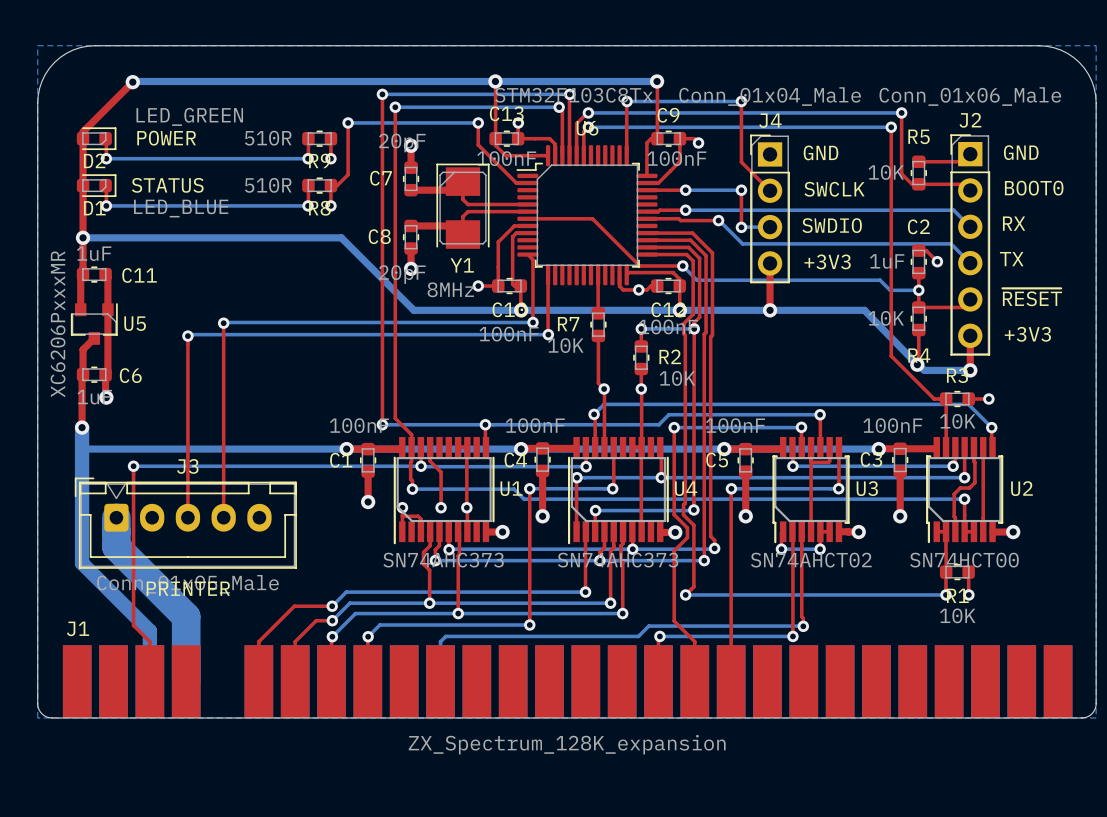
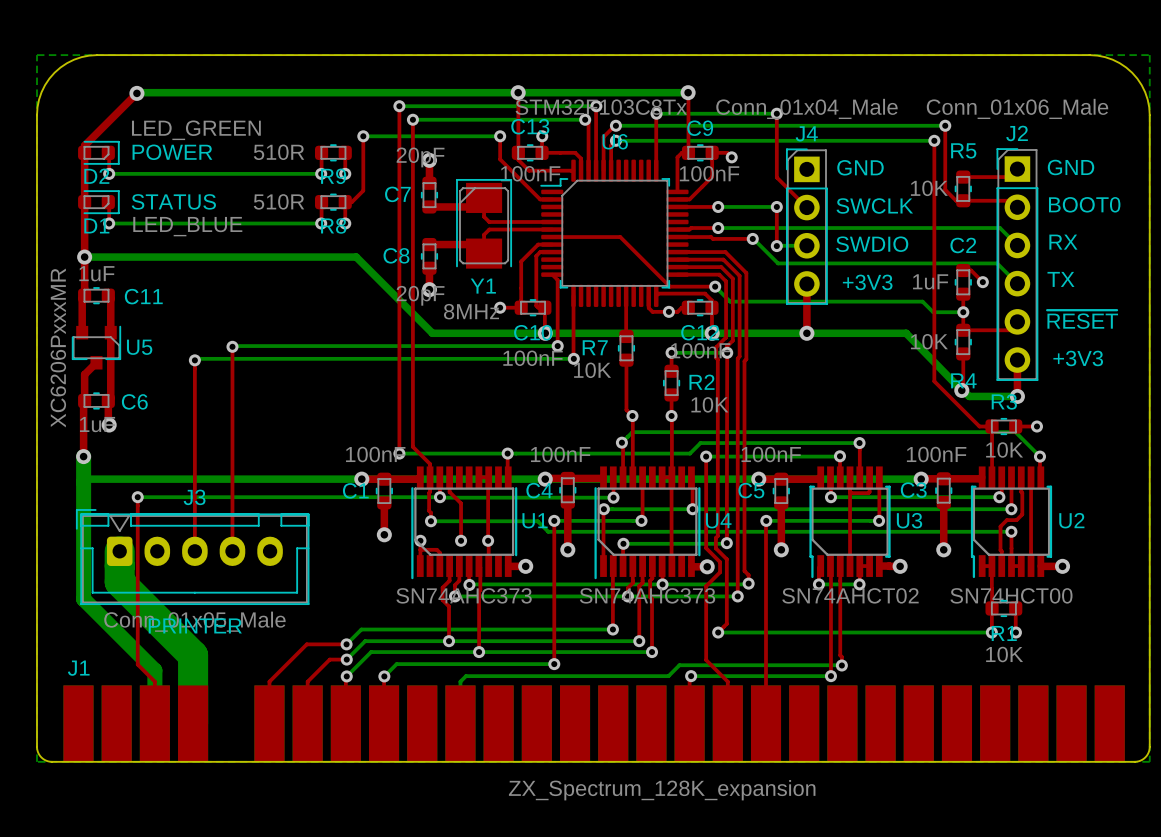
J1 value position: ZX_Spectrum_128K_expansion (567, 744) -> ZX_Spectrum_128K_expansion (662, 790)

